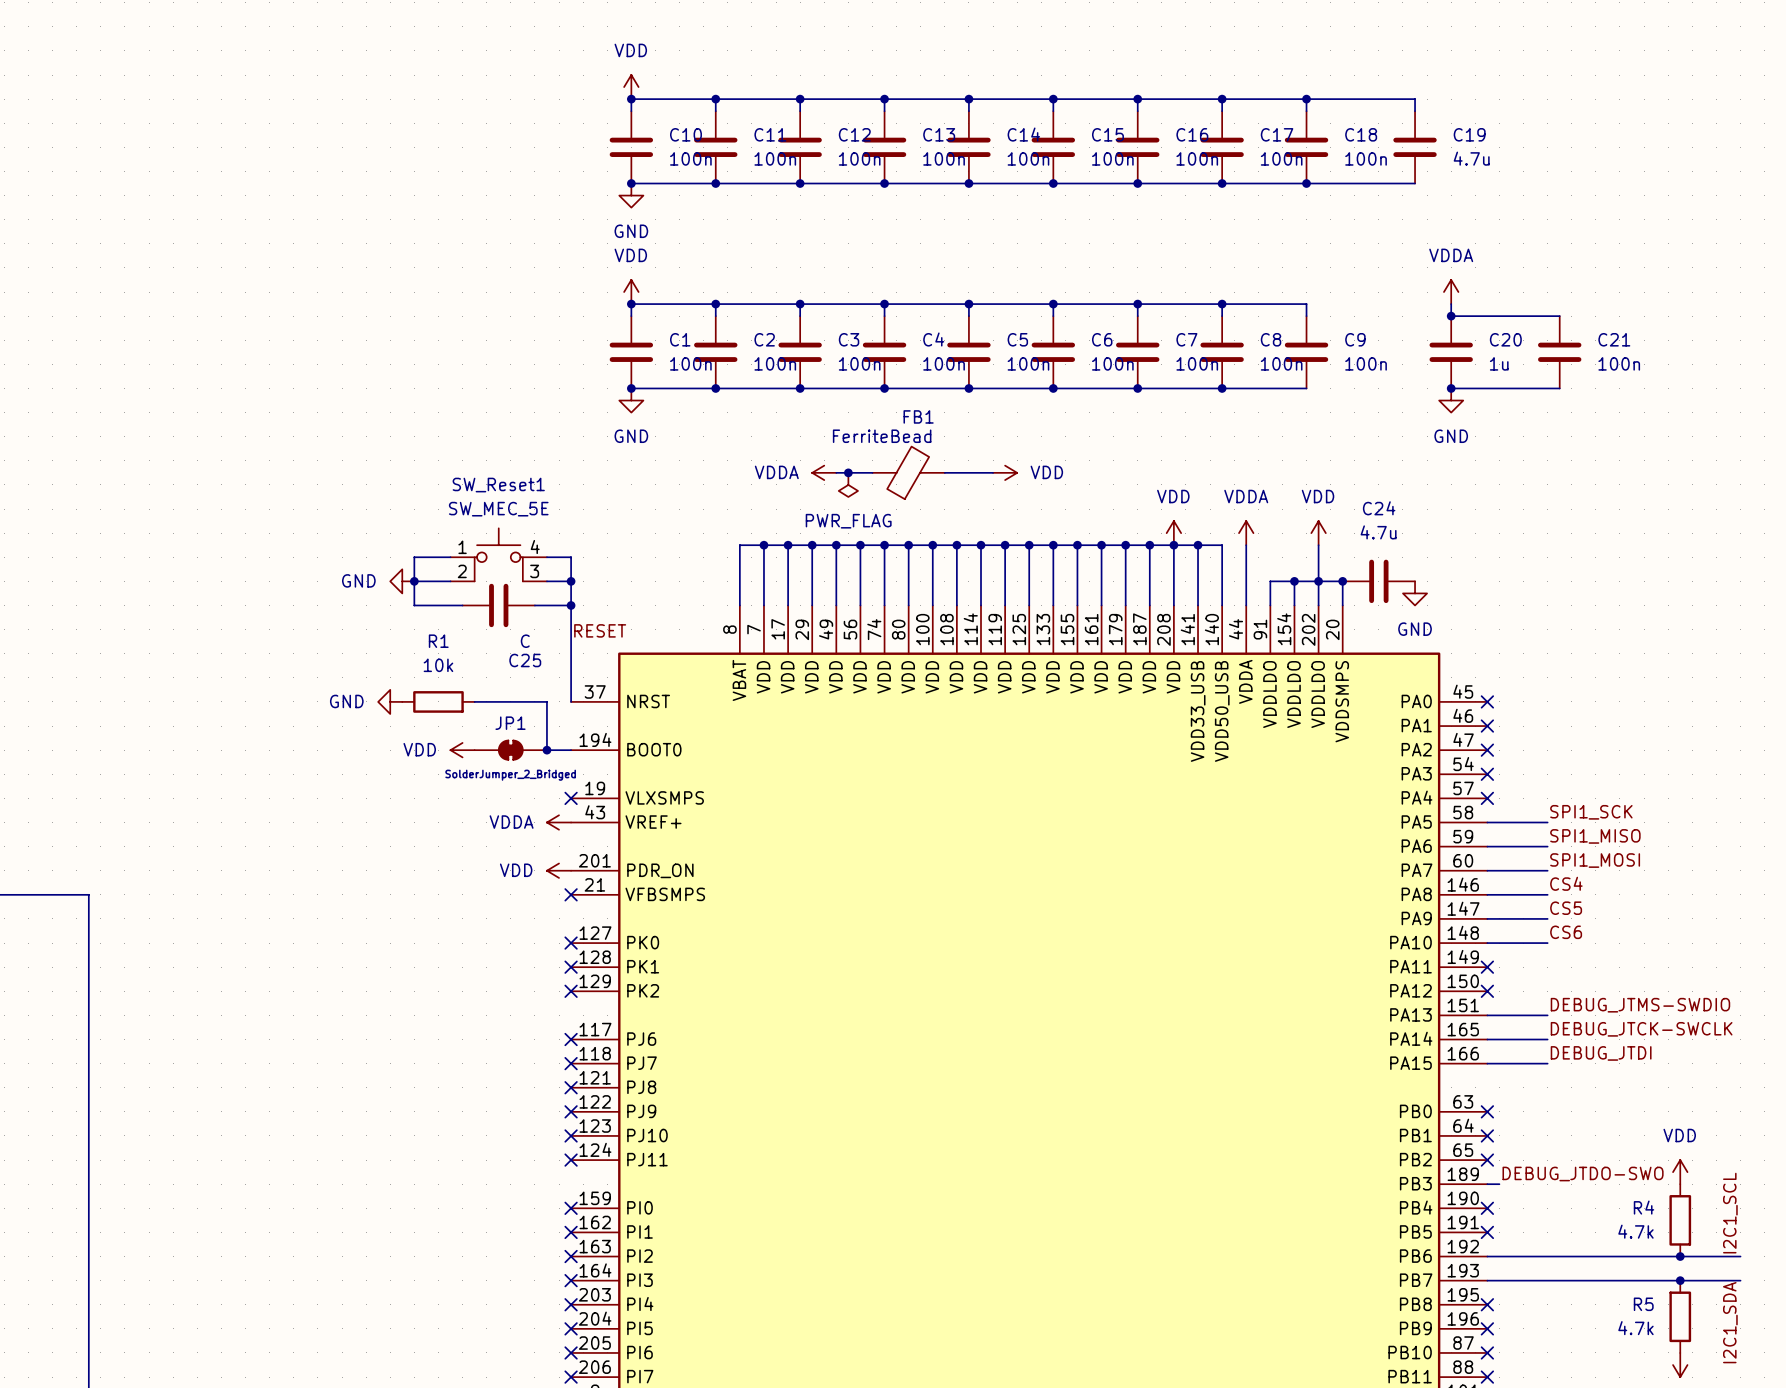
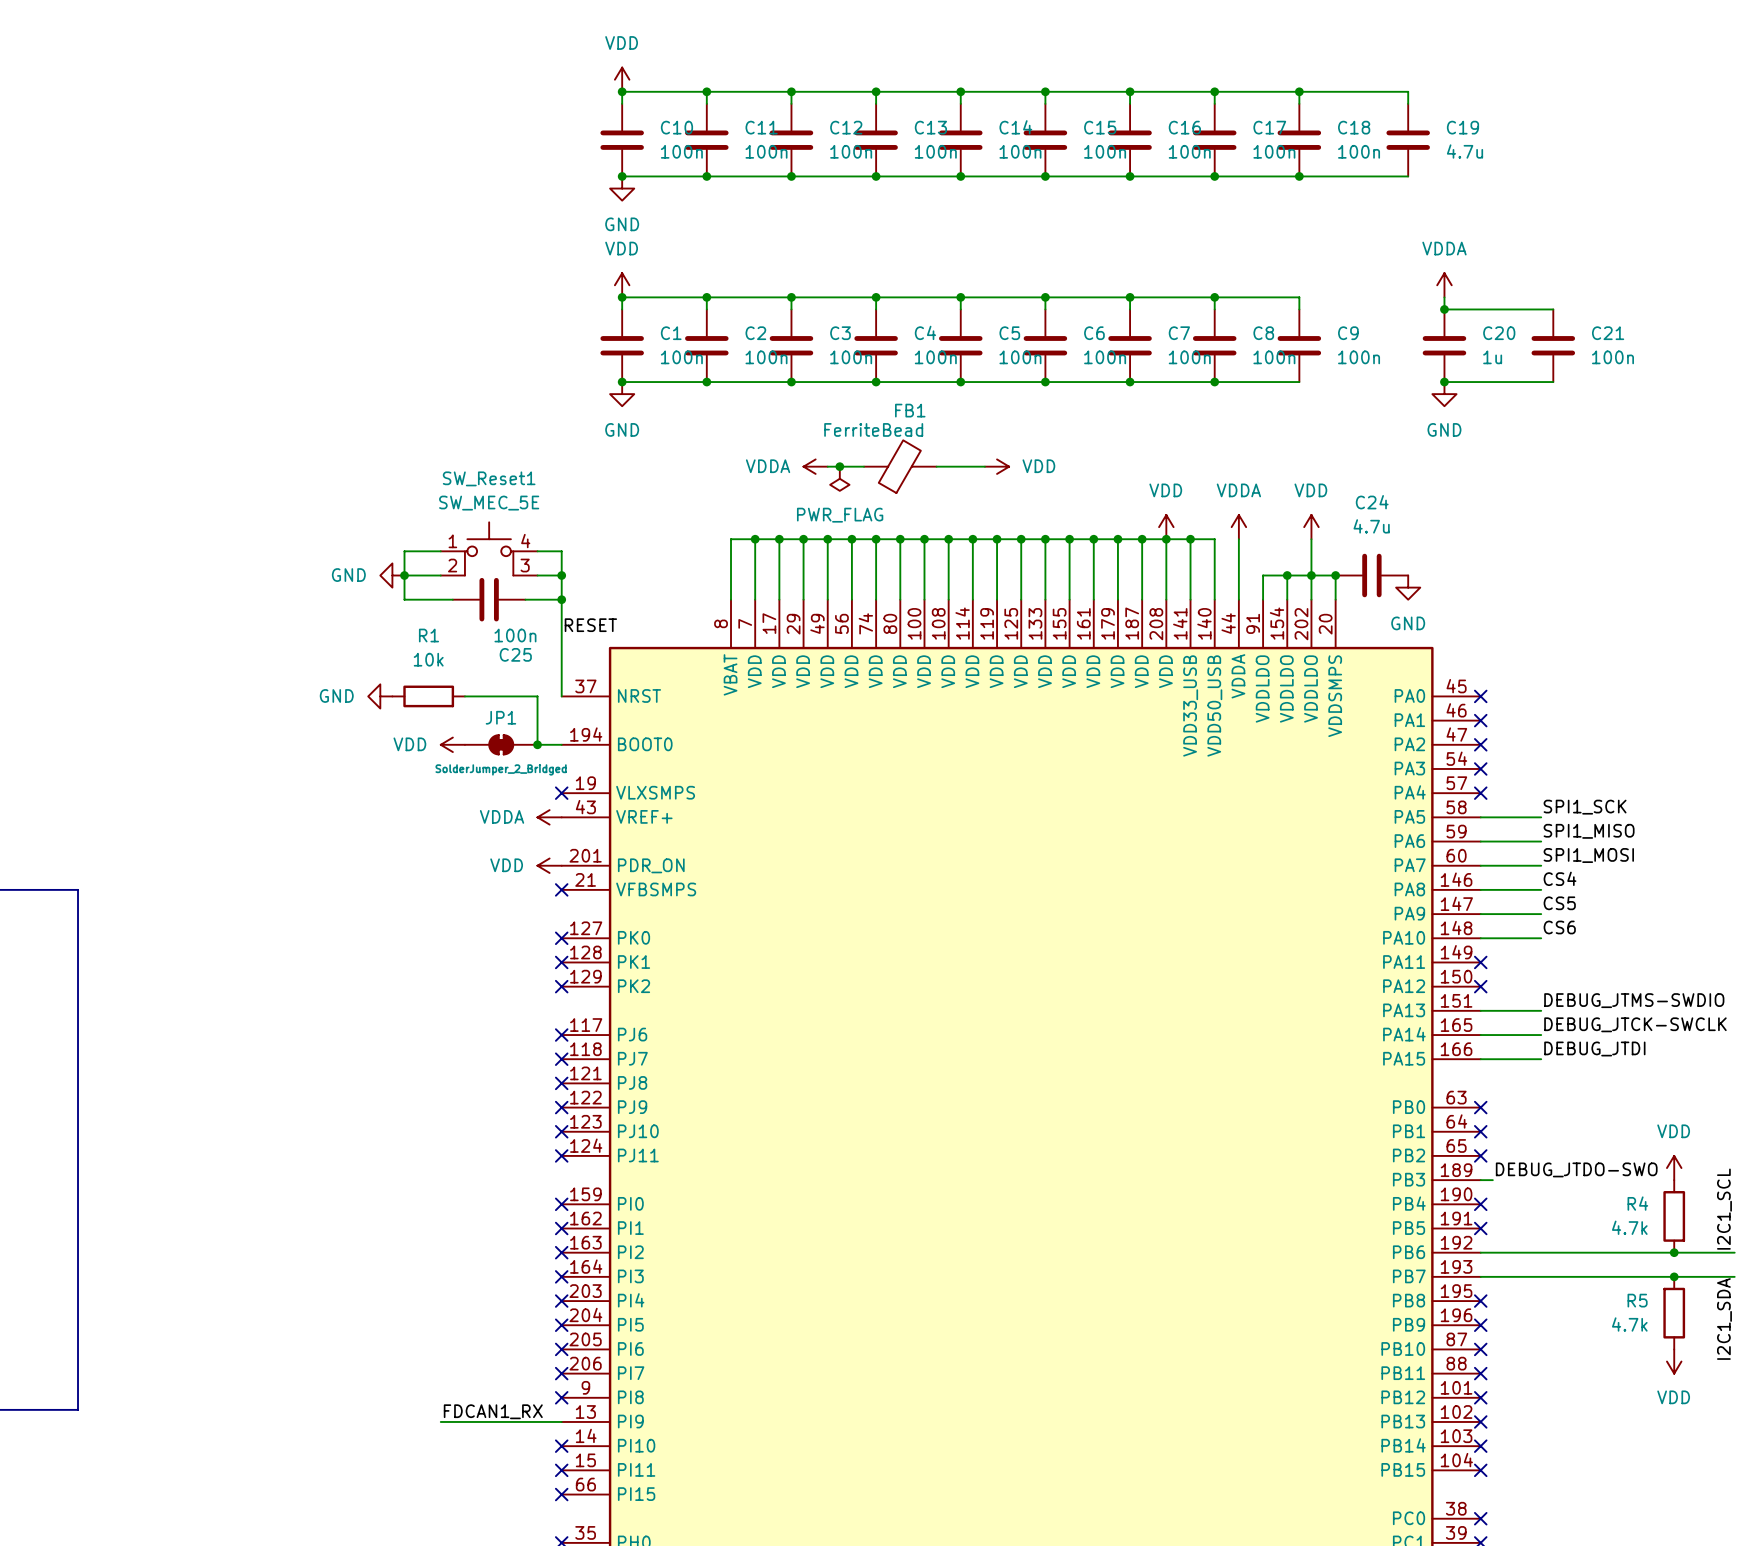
C25 value: C (525, 641) -> 100n (515, 635)

